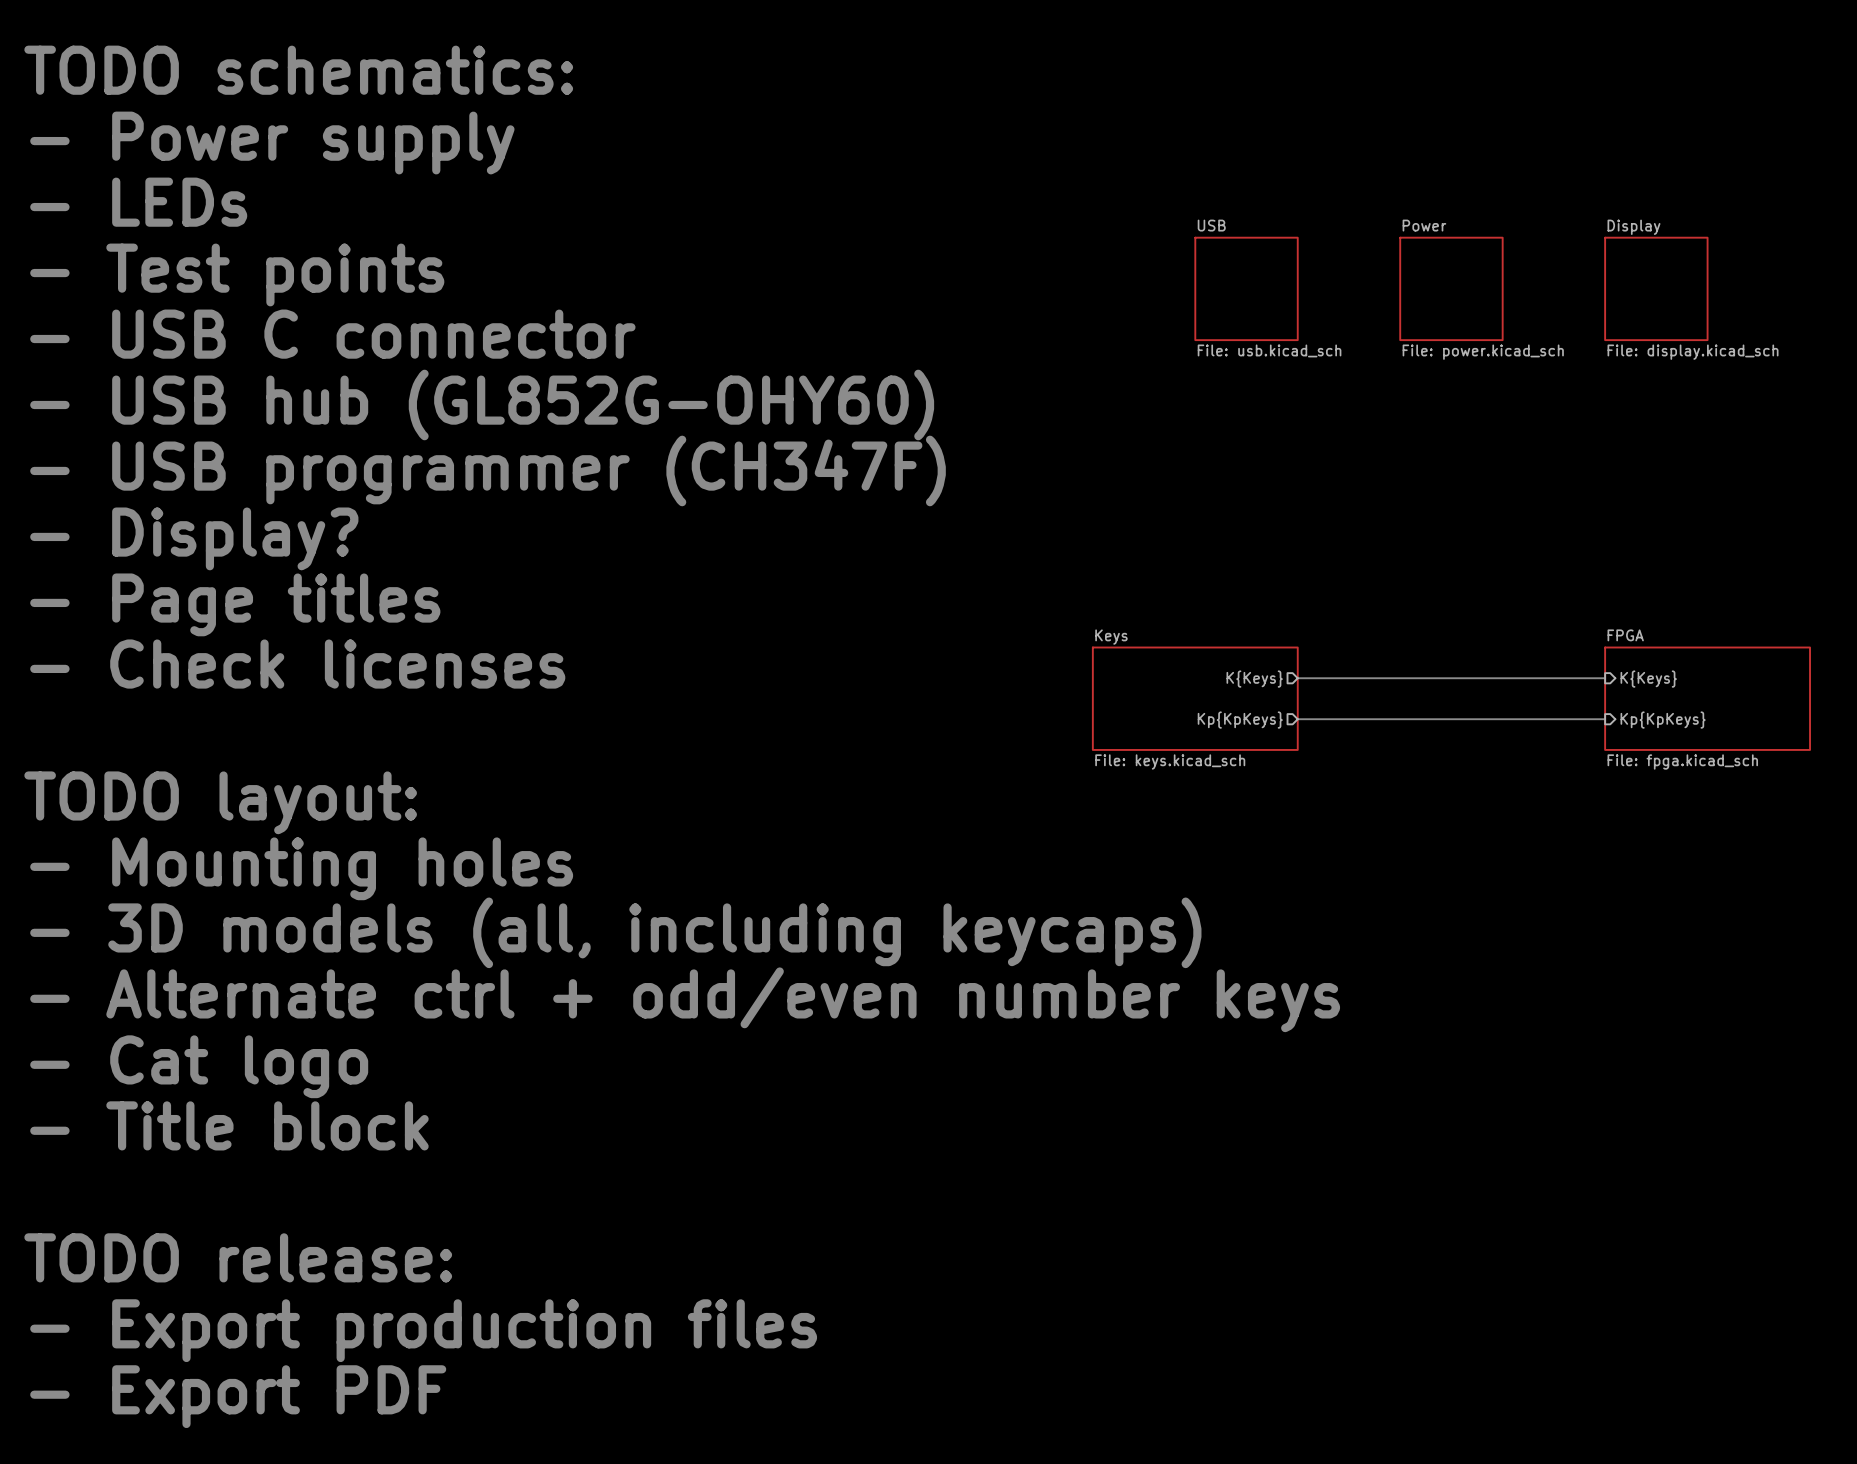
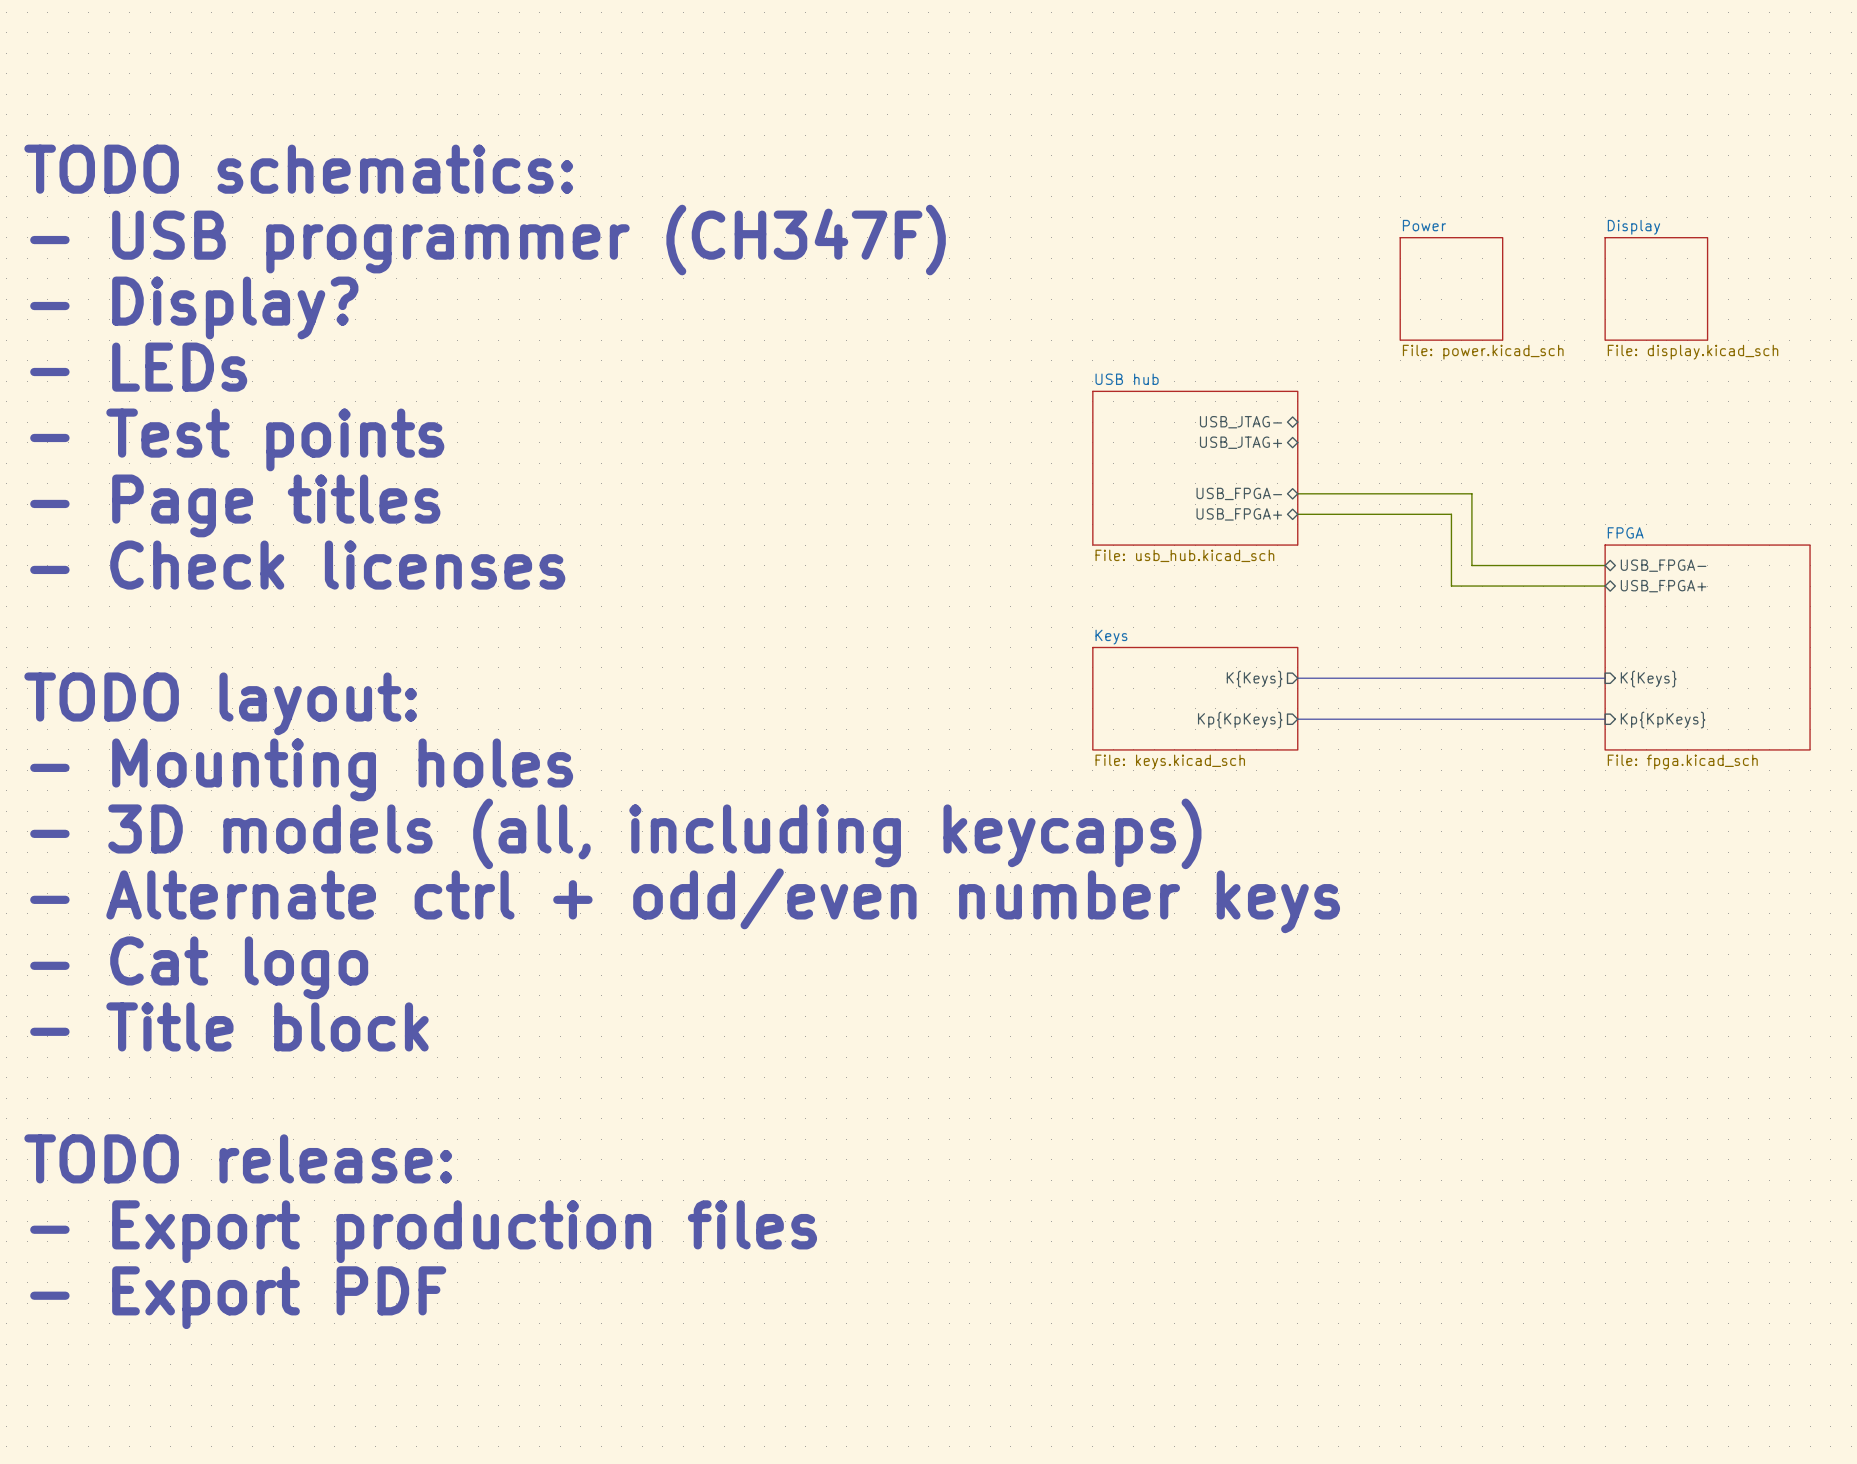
text position: TODO schematics: (298, 70) -> TODO schematics: (298, 169)
text: - Power supply (272, 143) -> none
text position: - LEDs (138, 202) -> - LEDs (138, 367)
text: none -> - USB programmer (CH347F) (488, 240)
text position: - Test points (237, 274) -> - Test points (237, 439)
sheet USB: File: usb.kicad_sch (1246, 288) -> none
text: none -> - Display? (194, 307)
text: - USB C connector (332, 334) -> none
text: - USB hub (GL852G-OHY60) (482, 404) -> none
sheet pin: none -> USB_JTAG- (1241, 422)
sheet pin: none -> USB_JTAG+ (1241, 442)
sheet USB hub: none -> File: usb_hub.kicad_sch (1195, 468)
text: - USB programmer (CH347F) (488, 470) -> none
sheet pin: none -> USB_FPGA- (1239, 493)
wire: none -> (1297, 493) (1471, 493) (1471, 565) (1605, 565)
sheet pin: none -> USB_FPGA+ (1239, 514)
wire: none -> (1297, 514) (1451, 514) (1451, 586) (1605, 586)
text: - Display? (194, 538) -> none
sheet pin: none -> USB_FPGA- (1663, 565)
sheet pin: none -> USB_FPGA+ (1663, 586)
text position: - Page titles (235, 604) -> - Page titles (235, 505)
sheet FPGA: none -> File: fpga.kicad_sch (1707, 647)
text position: - Check licenses (297, 664) -> - Check licenses (297, 565)
sheet FPGA: File: fpga.kicad_sch (1707, 698) -> none
text position: TODO layout: (220, 802) -> TODO layout: (220, 703)
text position: - Mounting holes (301, 868) -> - Mounting holes (301, 769)
text position: - 3D models (all, including keycaps) (615, 932) -> - 3D models (all, including keycaps) (615, 833)
text position: - Alternate ctrl + odd/even number keys (685, 999) -> - Alternate ctrl + odd/even number keys (685, 900)
text position: - Cat logo (199, 1066) -> - Cat logo (199, 967)
text position: - Title block (229, 1125) -> - Title block (229, 1026)
text position: TODO release: (238, 1257) -> TODO release: (238, 1158)
text position: - Export production files (423, 1330) -> - Export production files (423, 1231)
text position: - Export PDF (238, 1396) -> - Export PDF (238, 1297)

